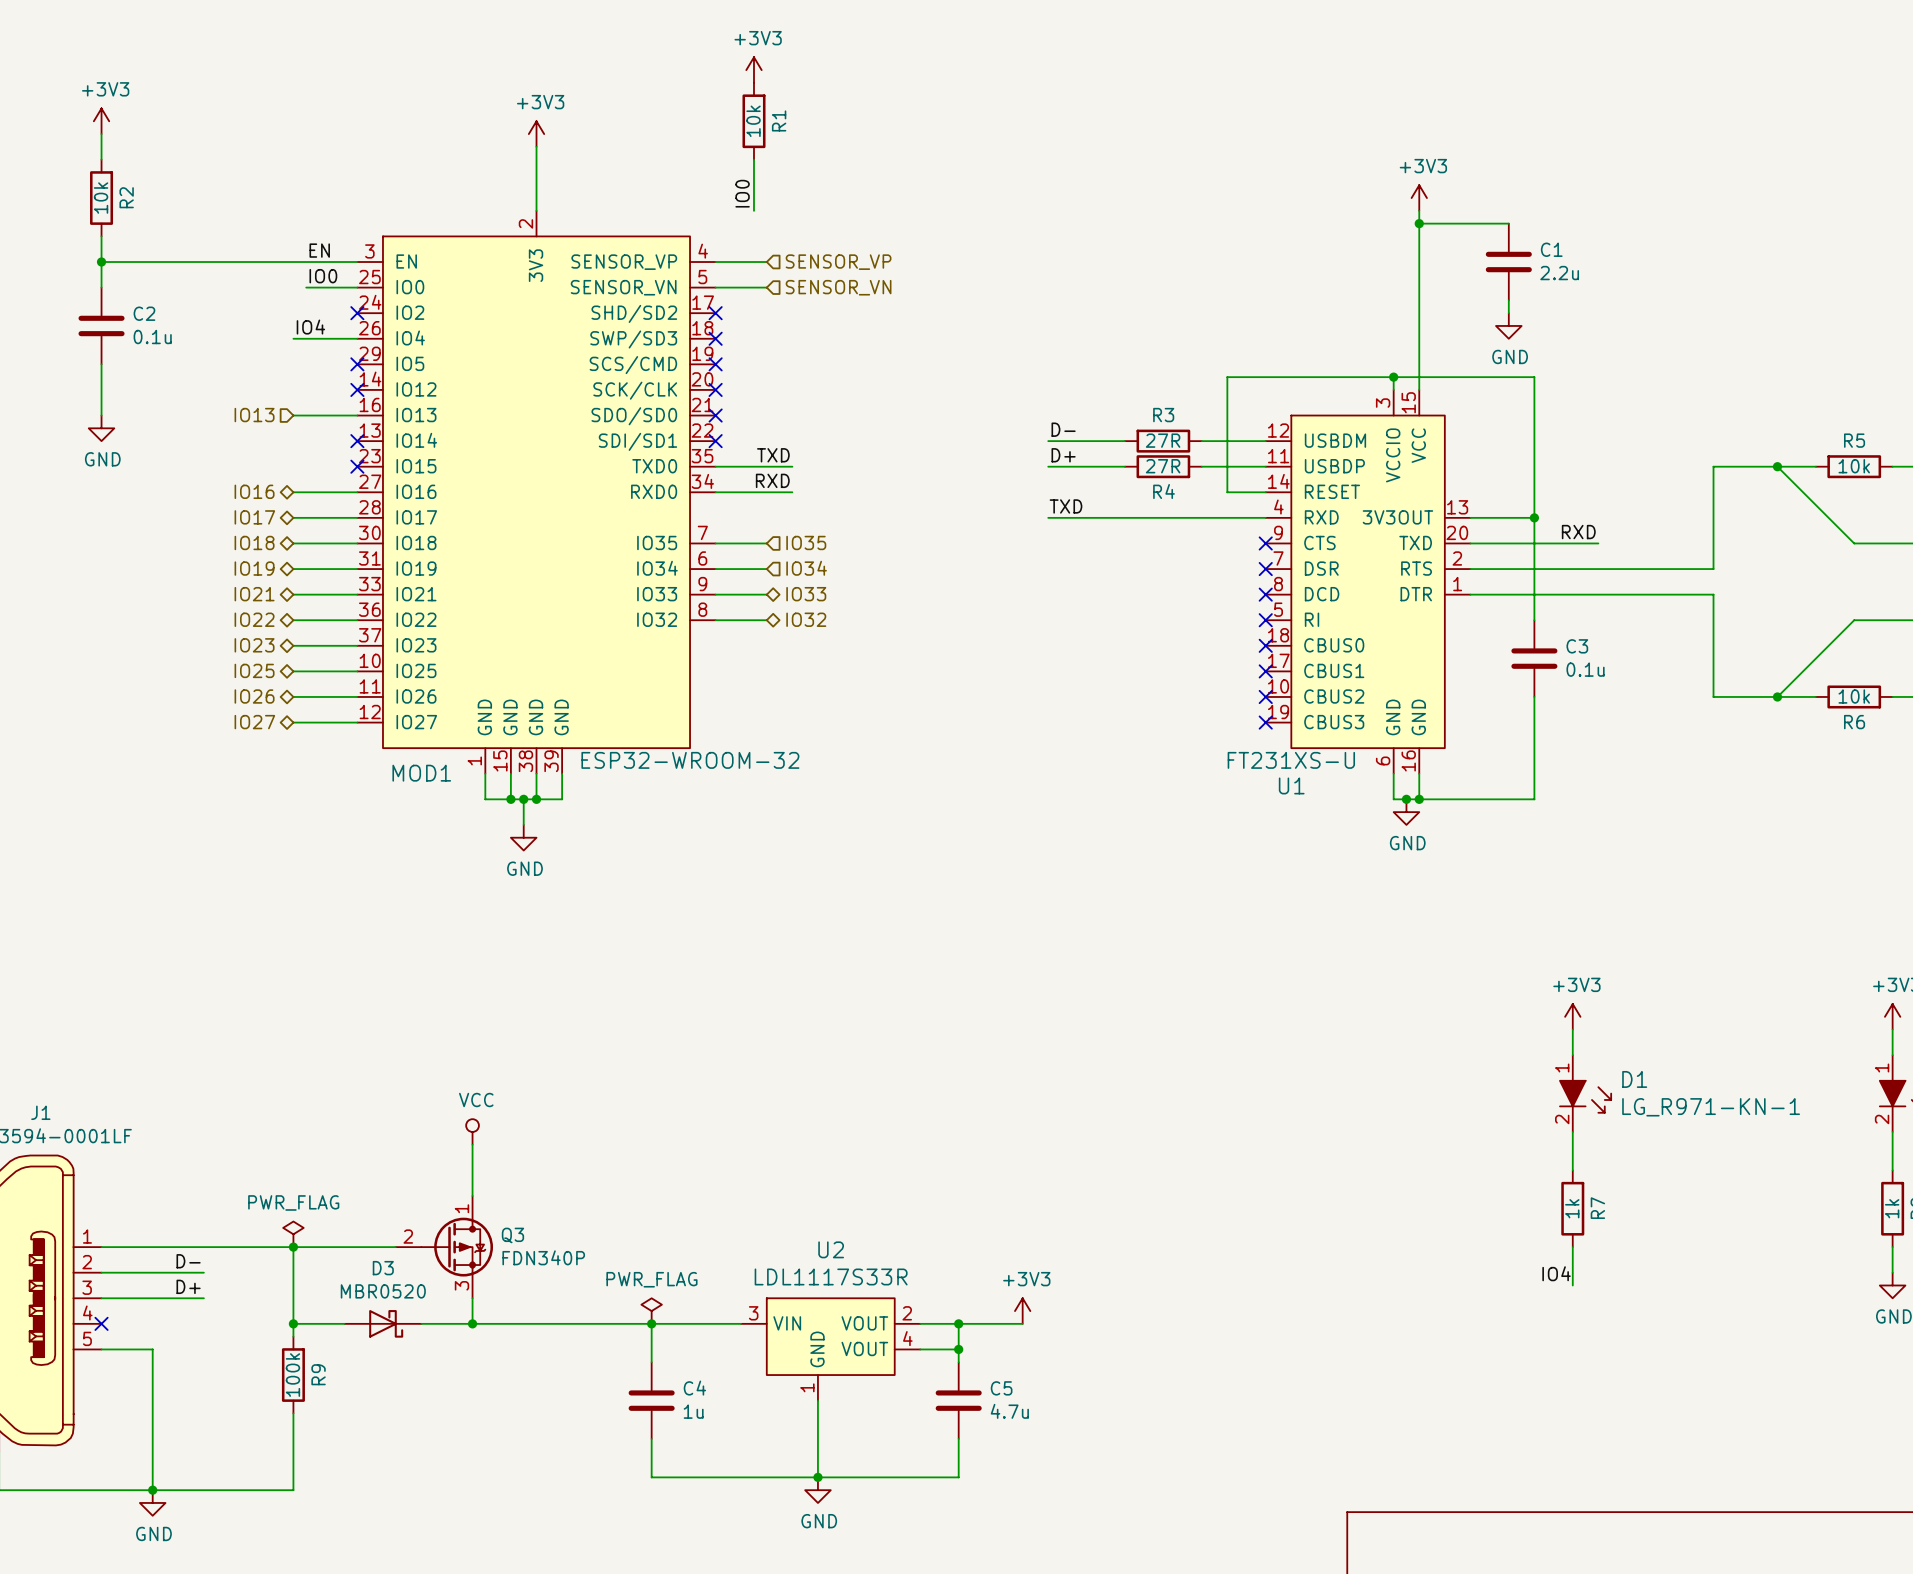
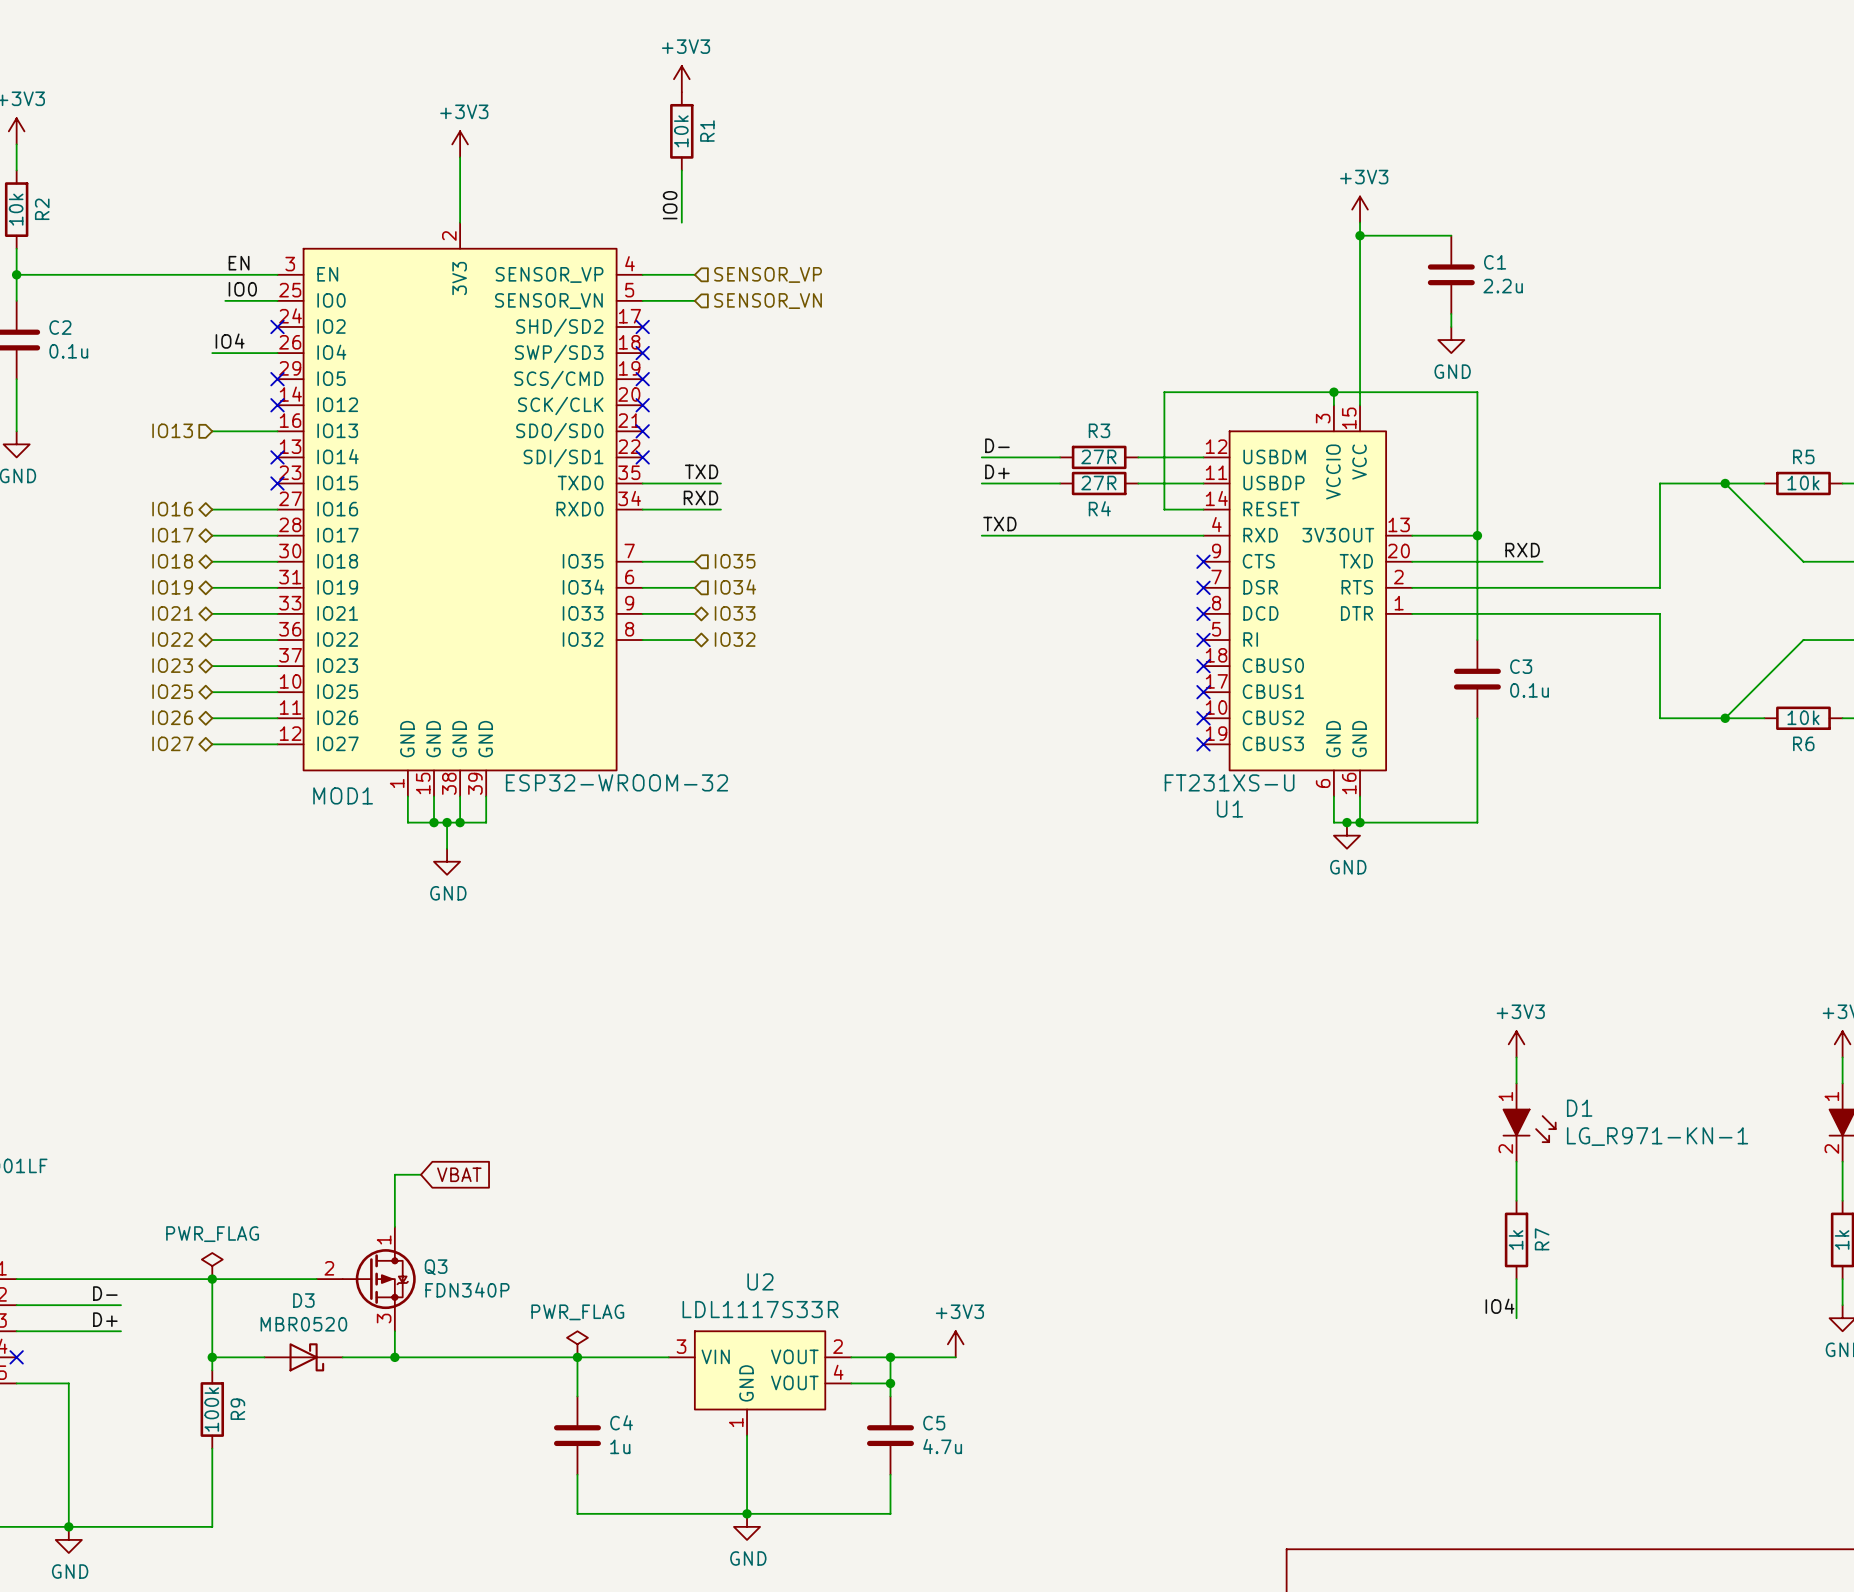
power symbol: VCC (472, 1131) -> none
wire: none -> (394, 1174) (420, 1174)
global label: none -> VBAT (459, 1174)

